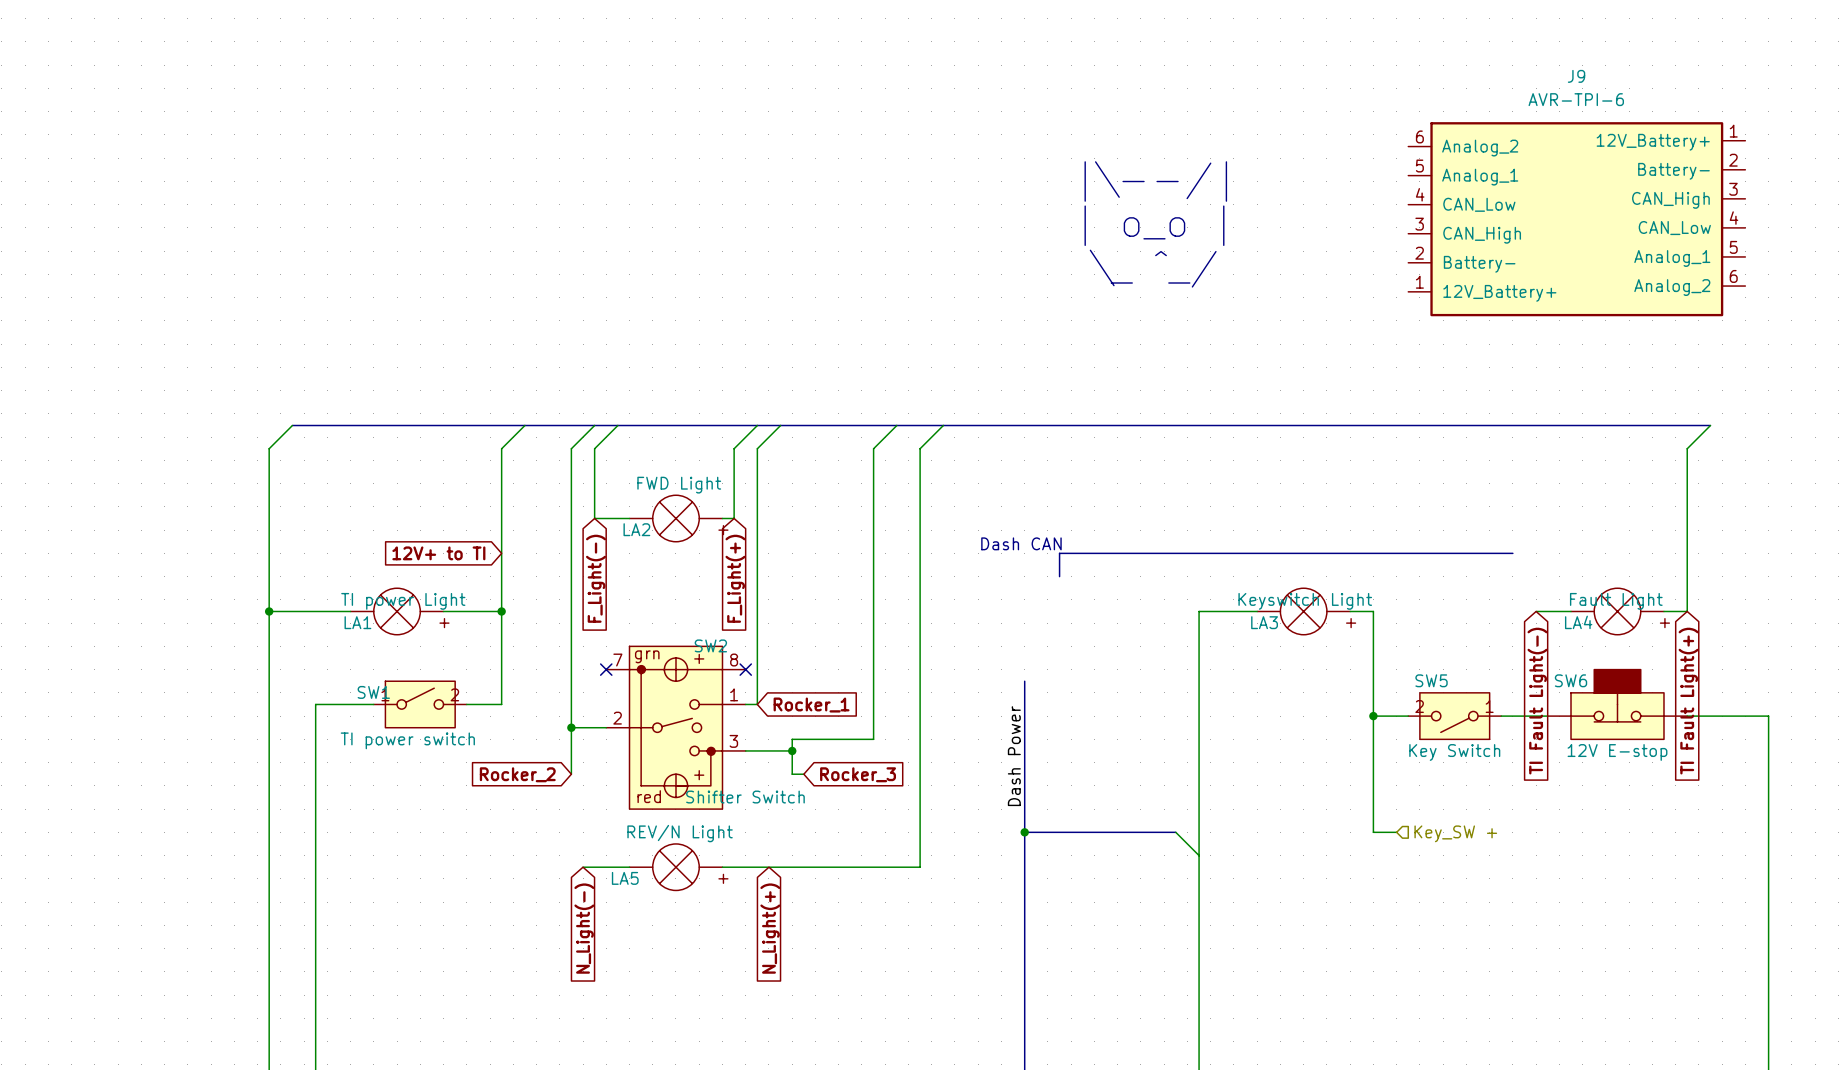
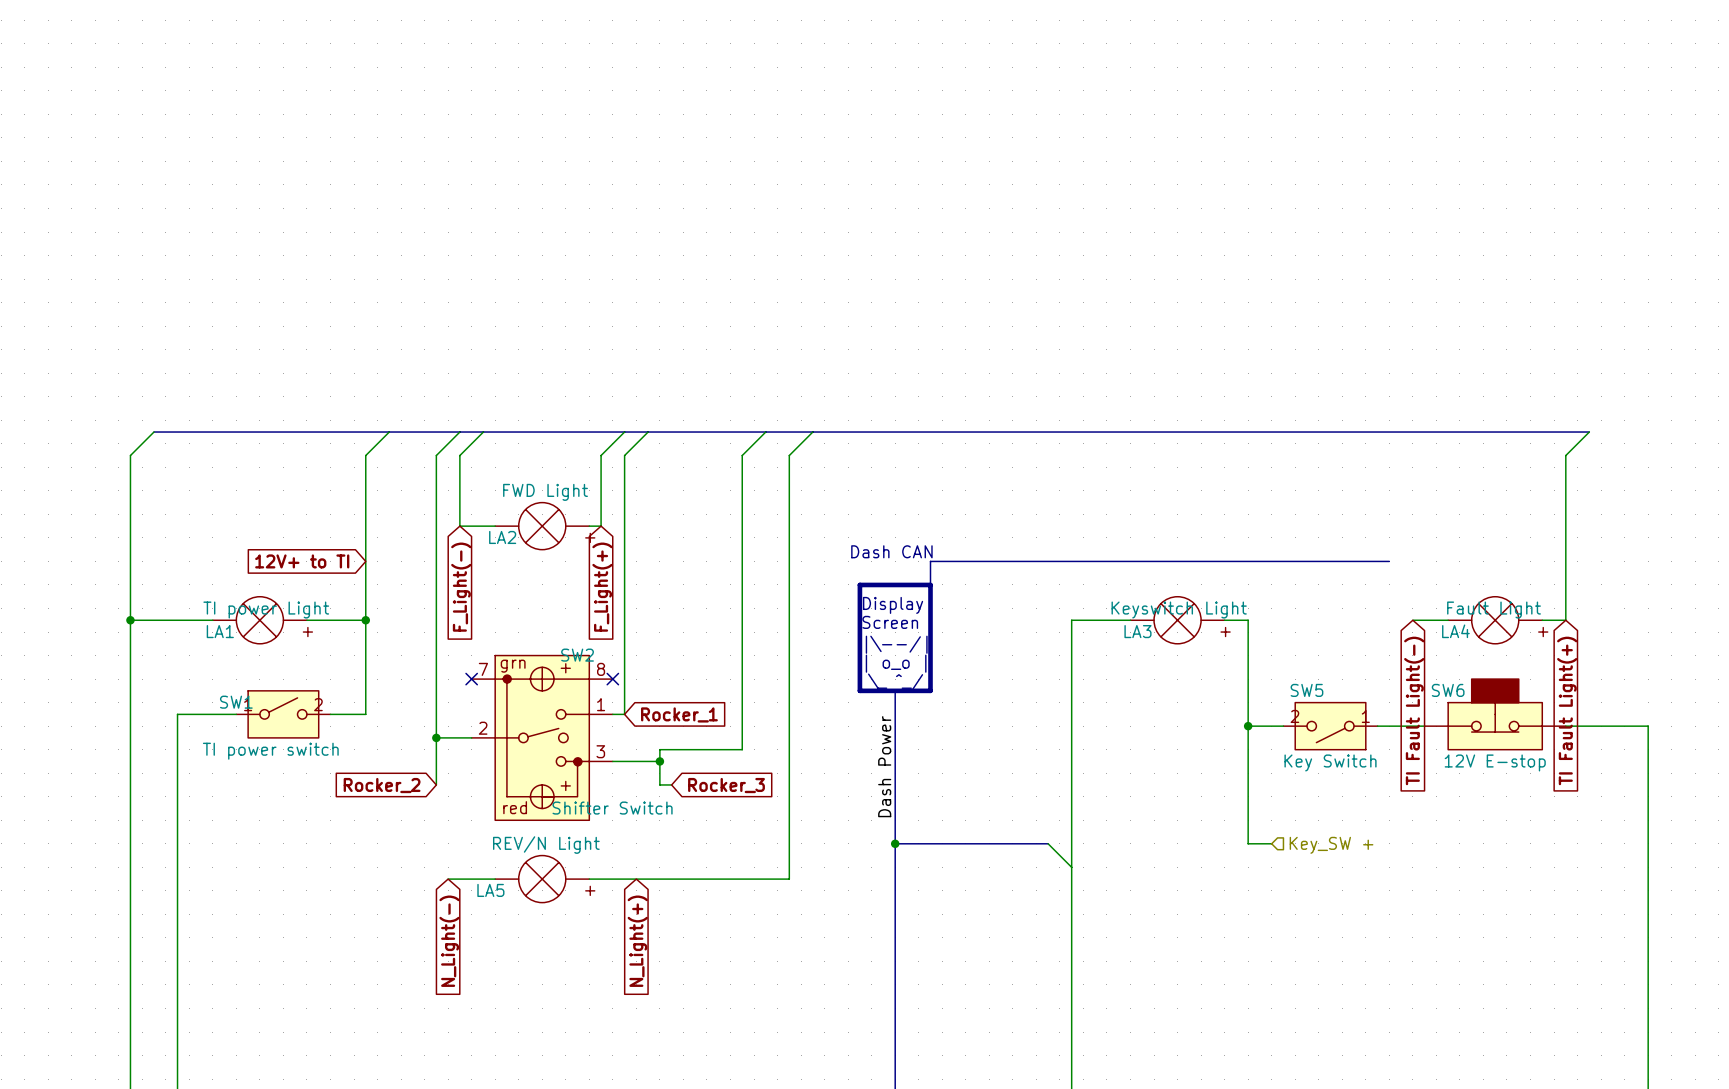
text: |\--/| (1155, 181) -> none
J9: AVR-TPI-6 (1576, 219) -> none
text: | o_o | (1154, 225) -> none
text: \_ ^_/ (1153, 268) -> none
line: none -> (859, 584) (930, 584) (930, 690) (859, 690) (859, 584)
text: none -> Display (893, 605)
text: none -> Screen (890, 622)
text: none -> |\--/| (896, 644)
text: none -> | o_o | (896, 663)
text: none -> \_ ^_/ (895, 682)

